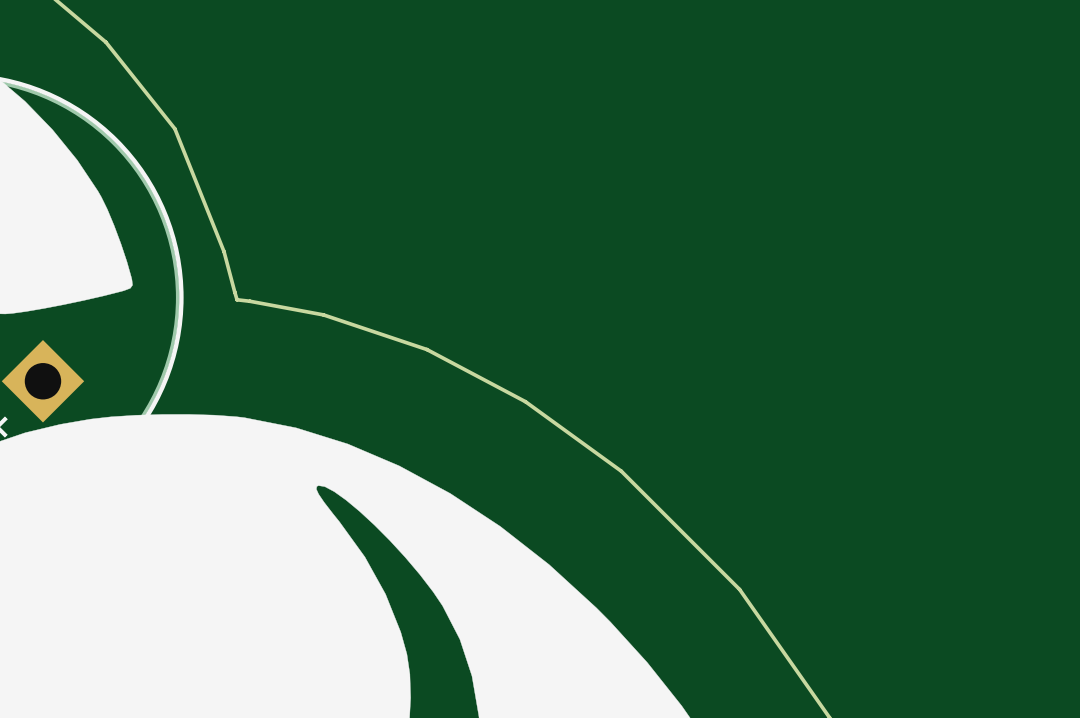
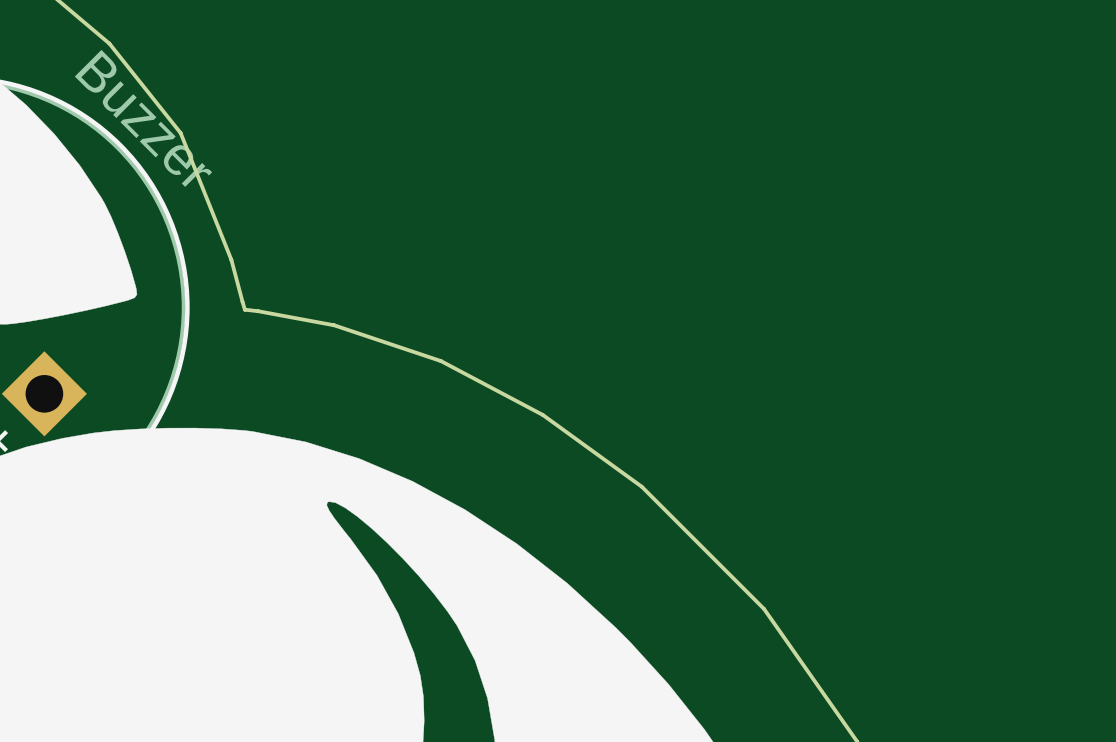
part value: none -> Buzzer (143, 118)

